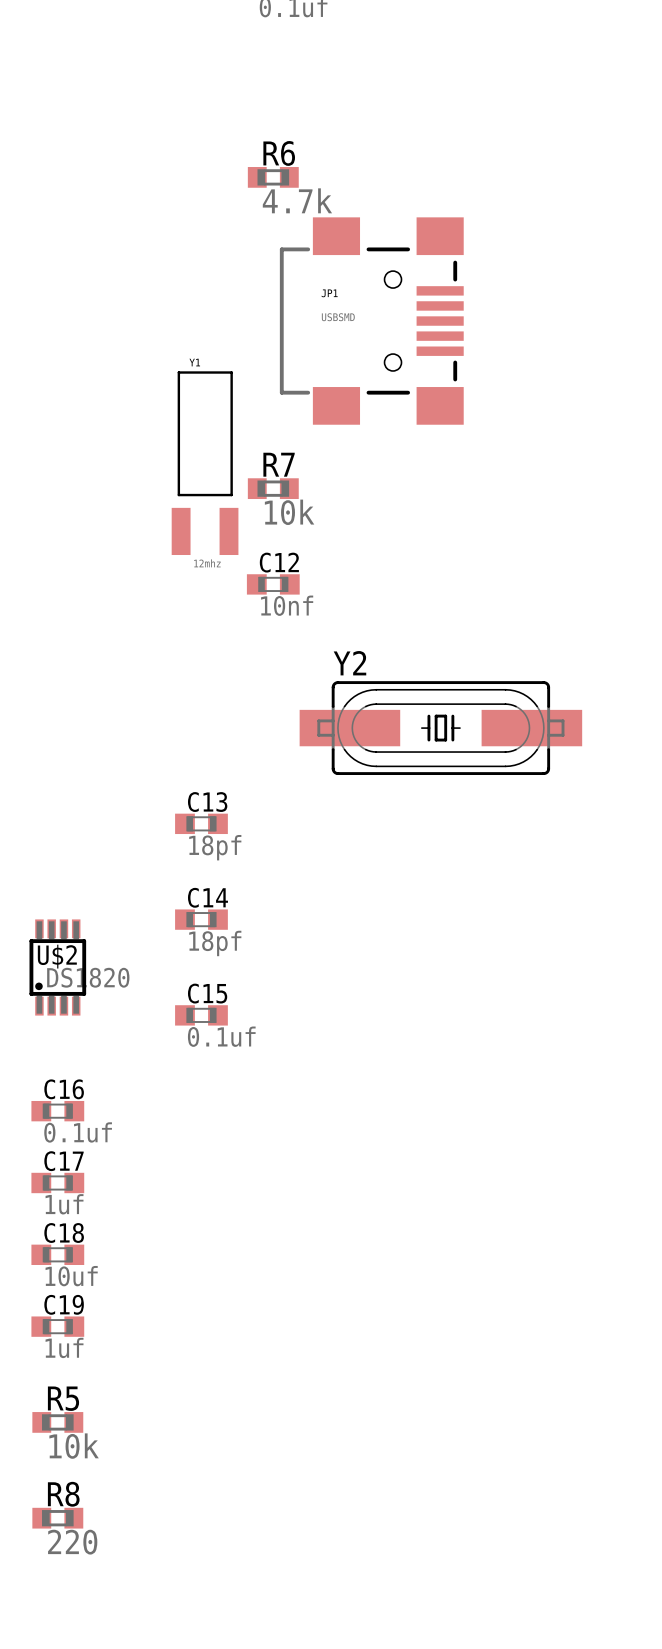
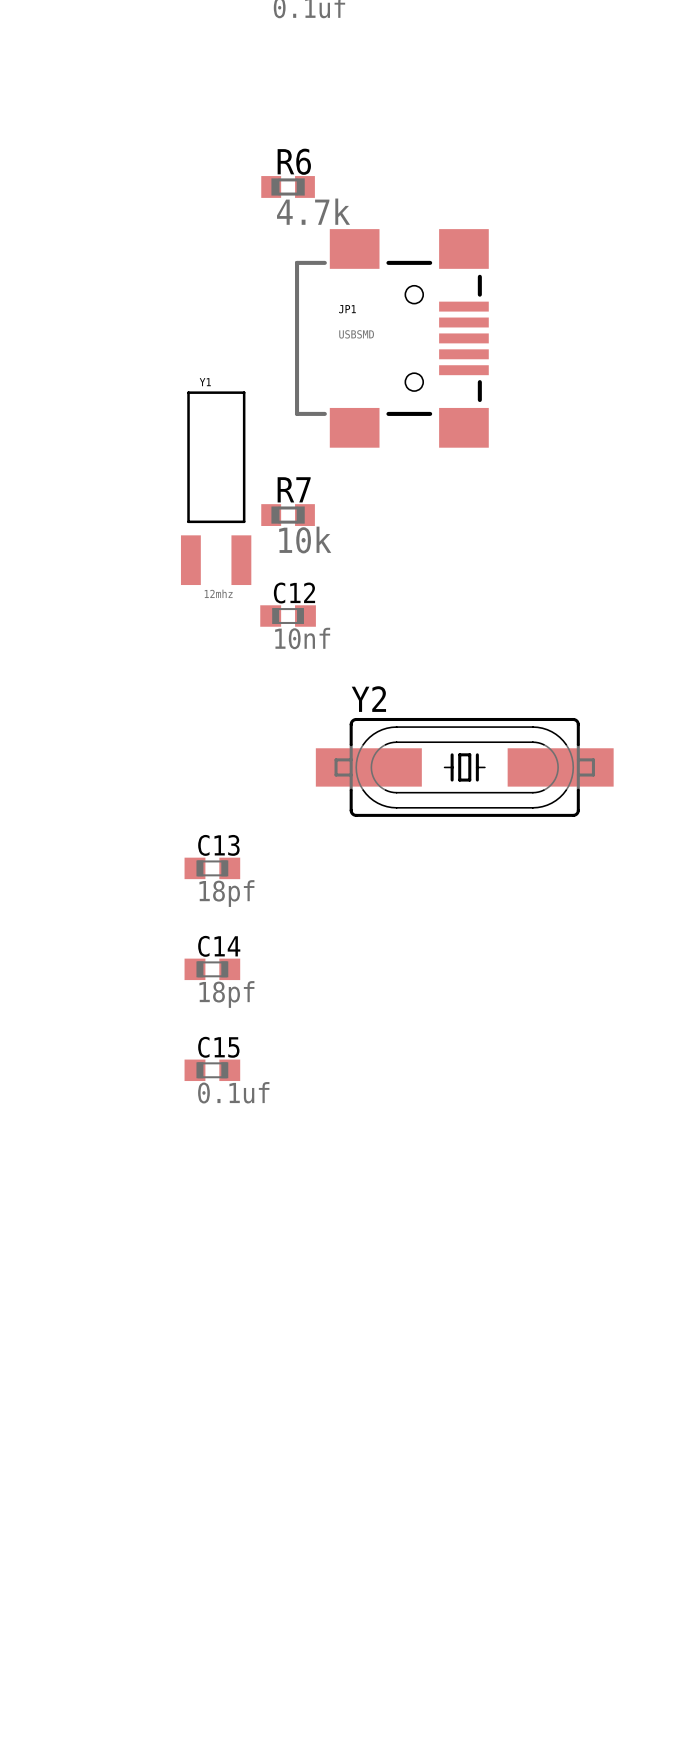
U$2: DS1820 (57, 967) -> none
C16: 0.1uf (57, 1111) -> none
C17: 1uf (57, 1182) -> none
C18: 10uf (57, 1254) -> none
C19: 1uf (57, 1326) -> none
R5: 10k (57, 1422) -> none
R8: 220 (57, 1518) -> none

